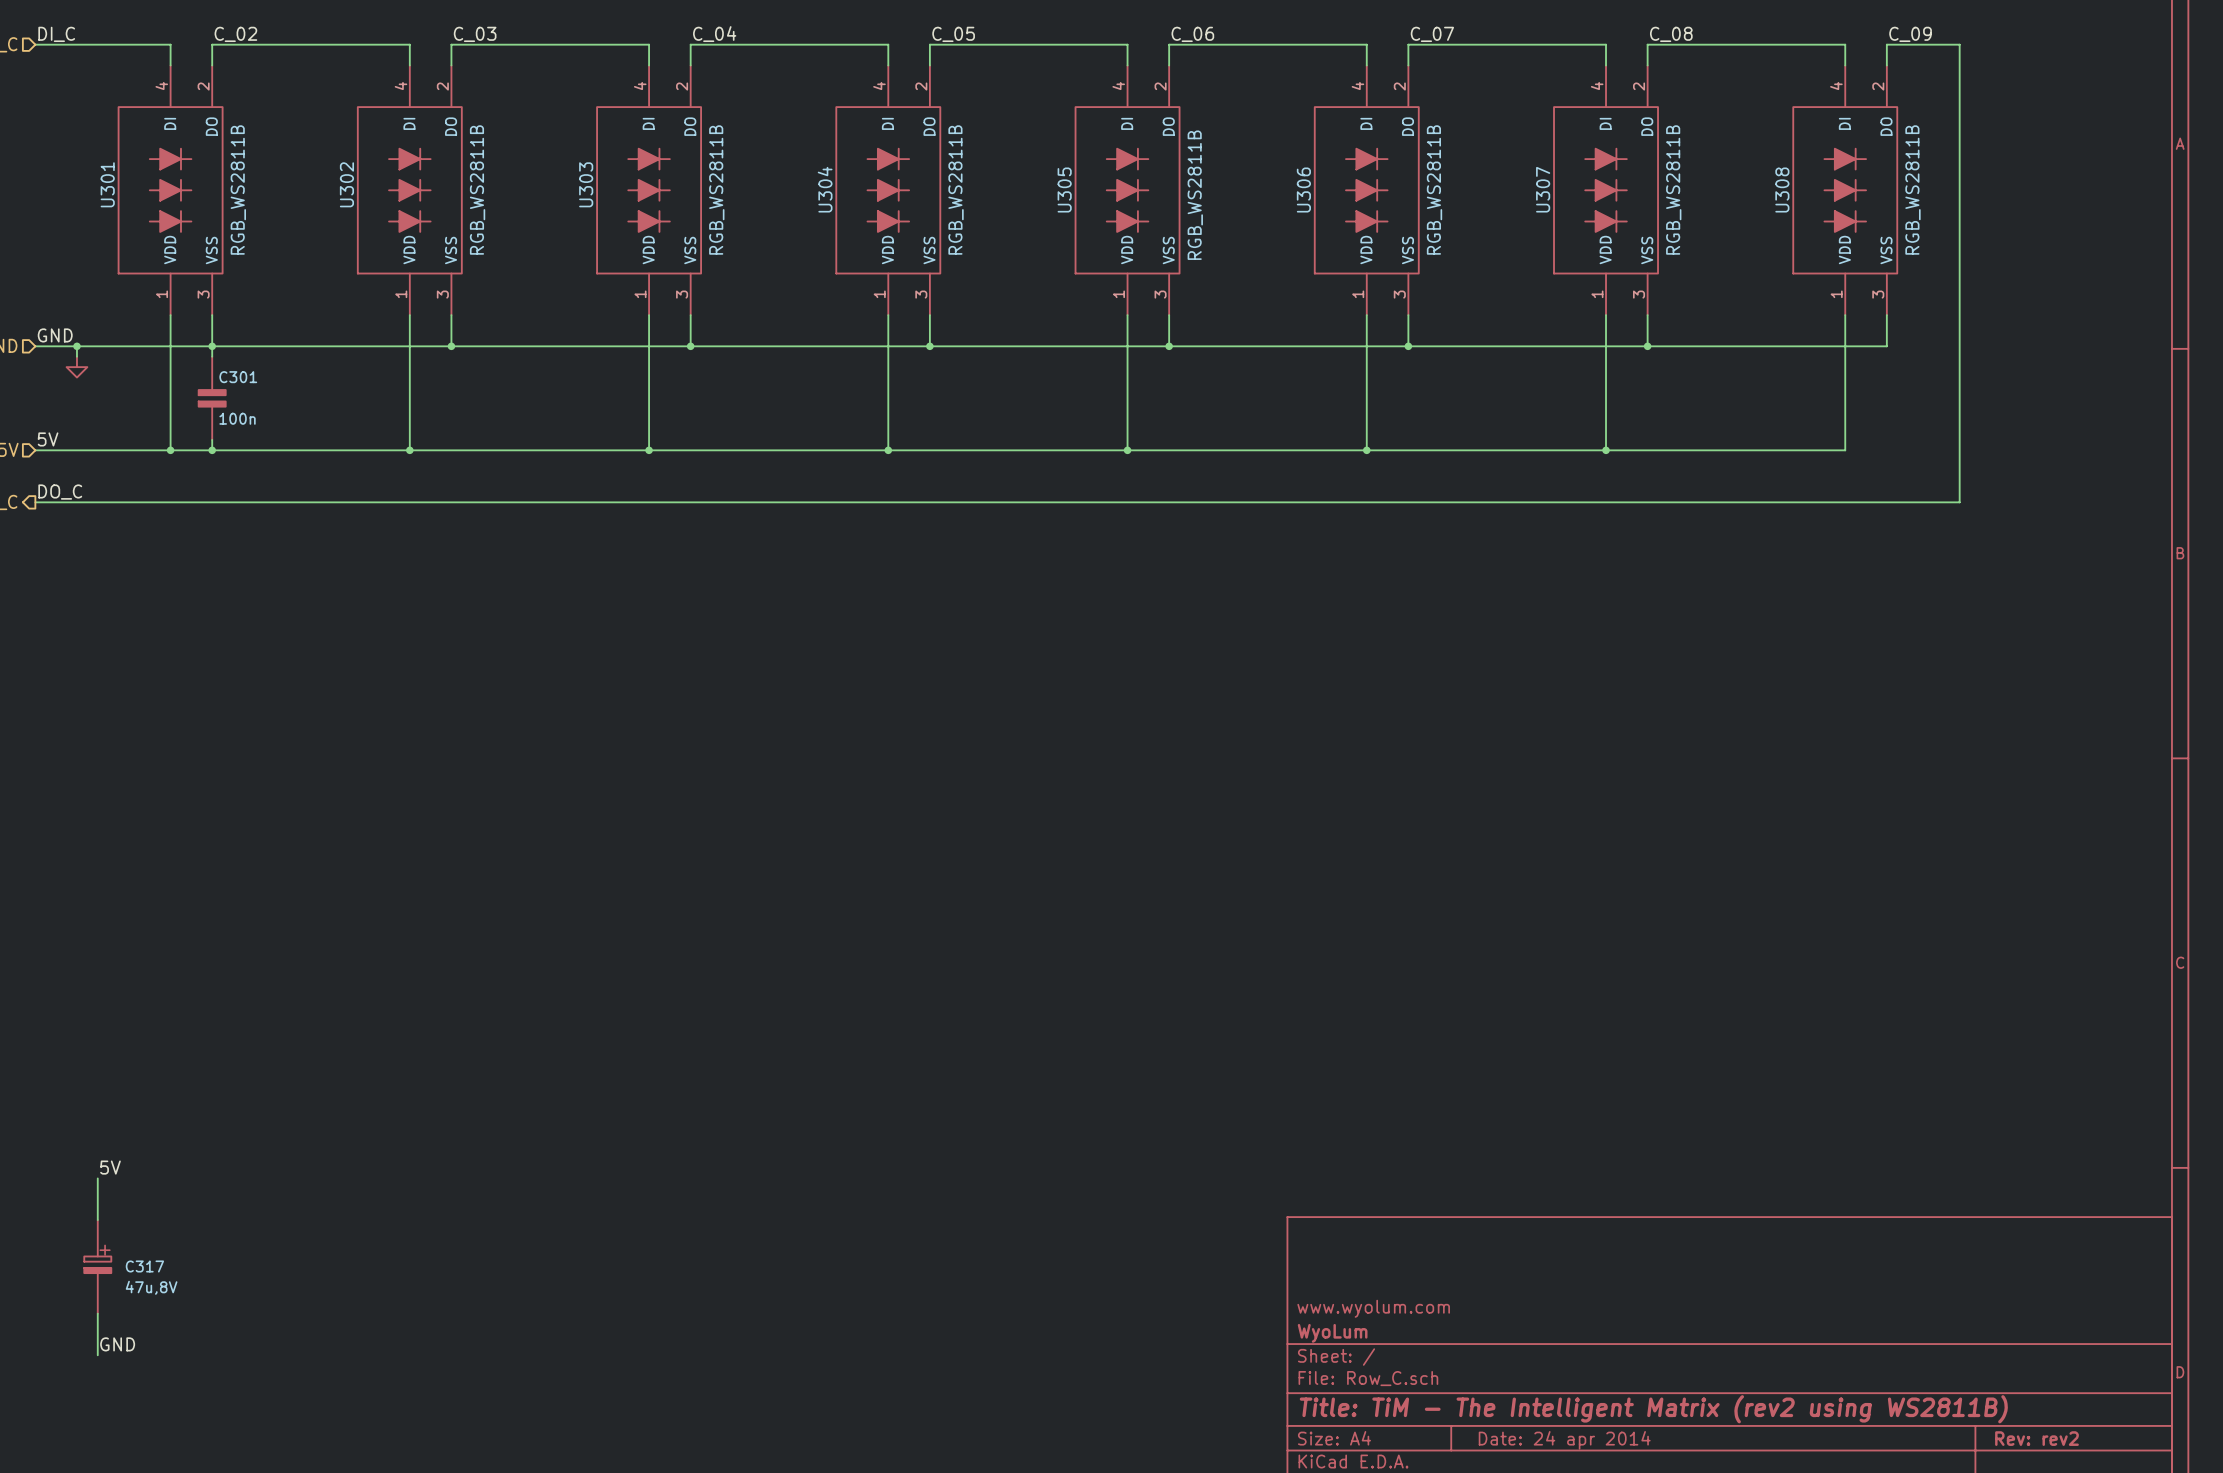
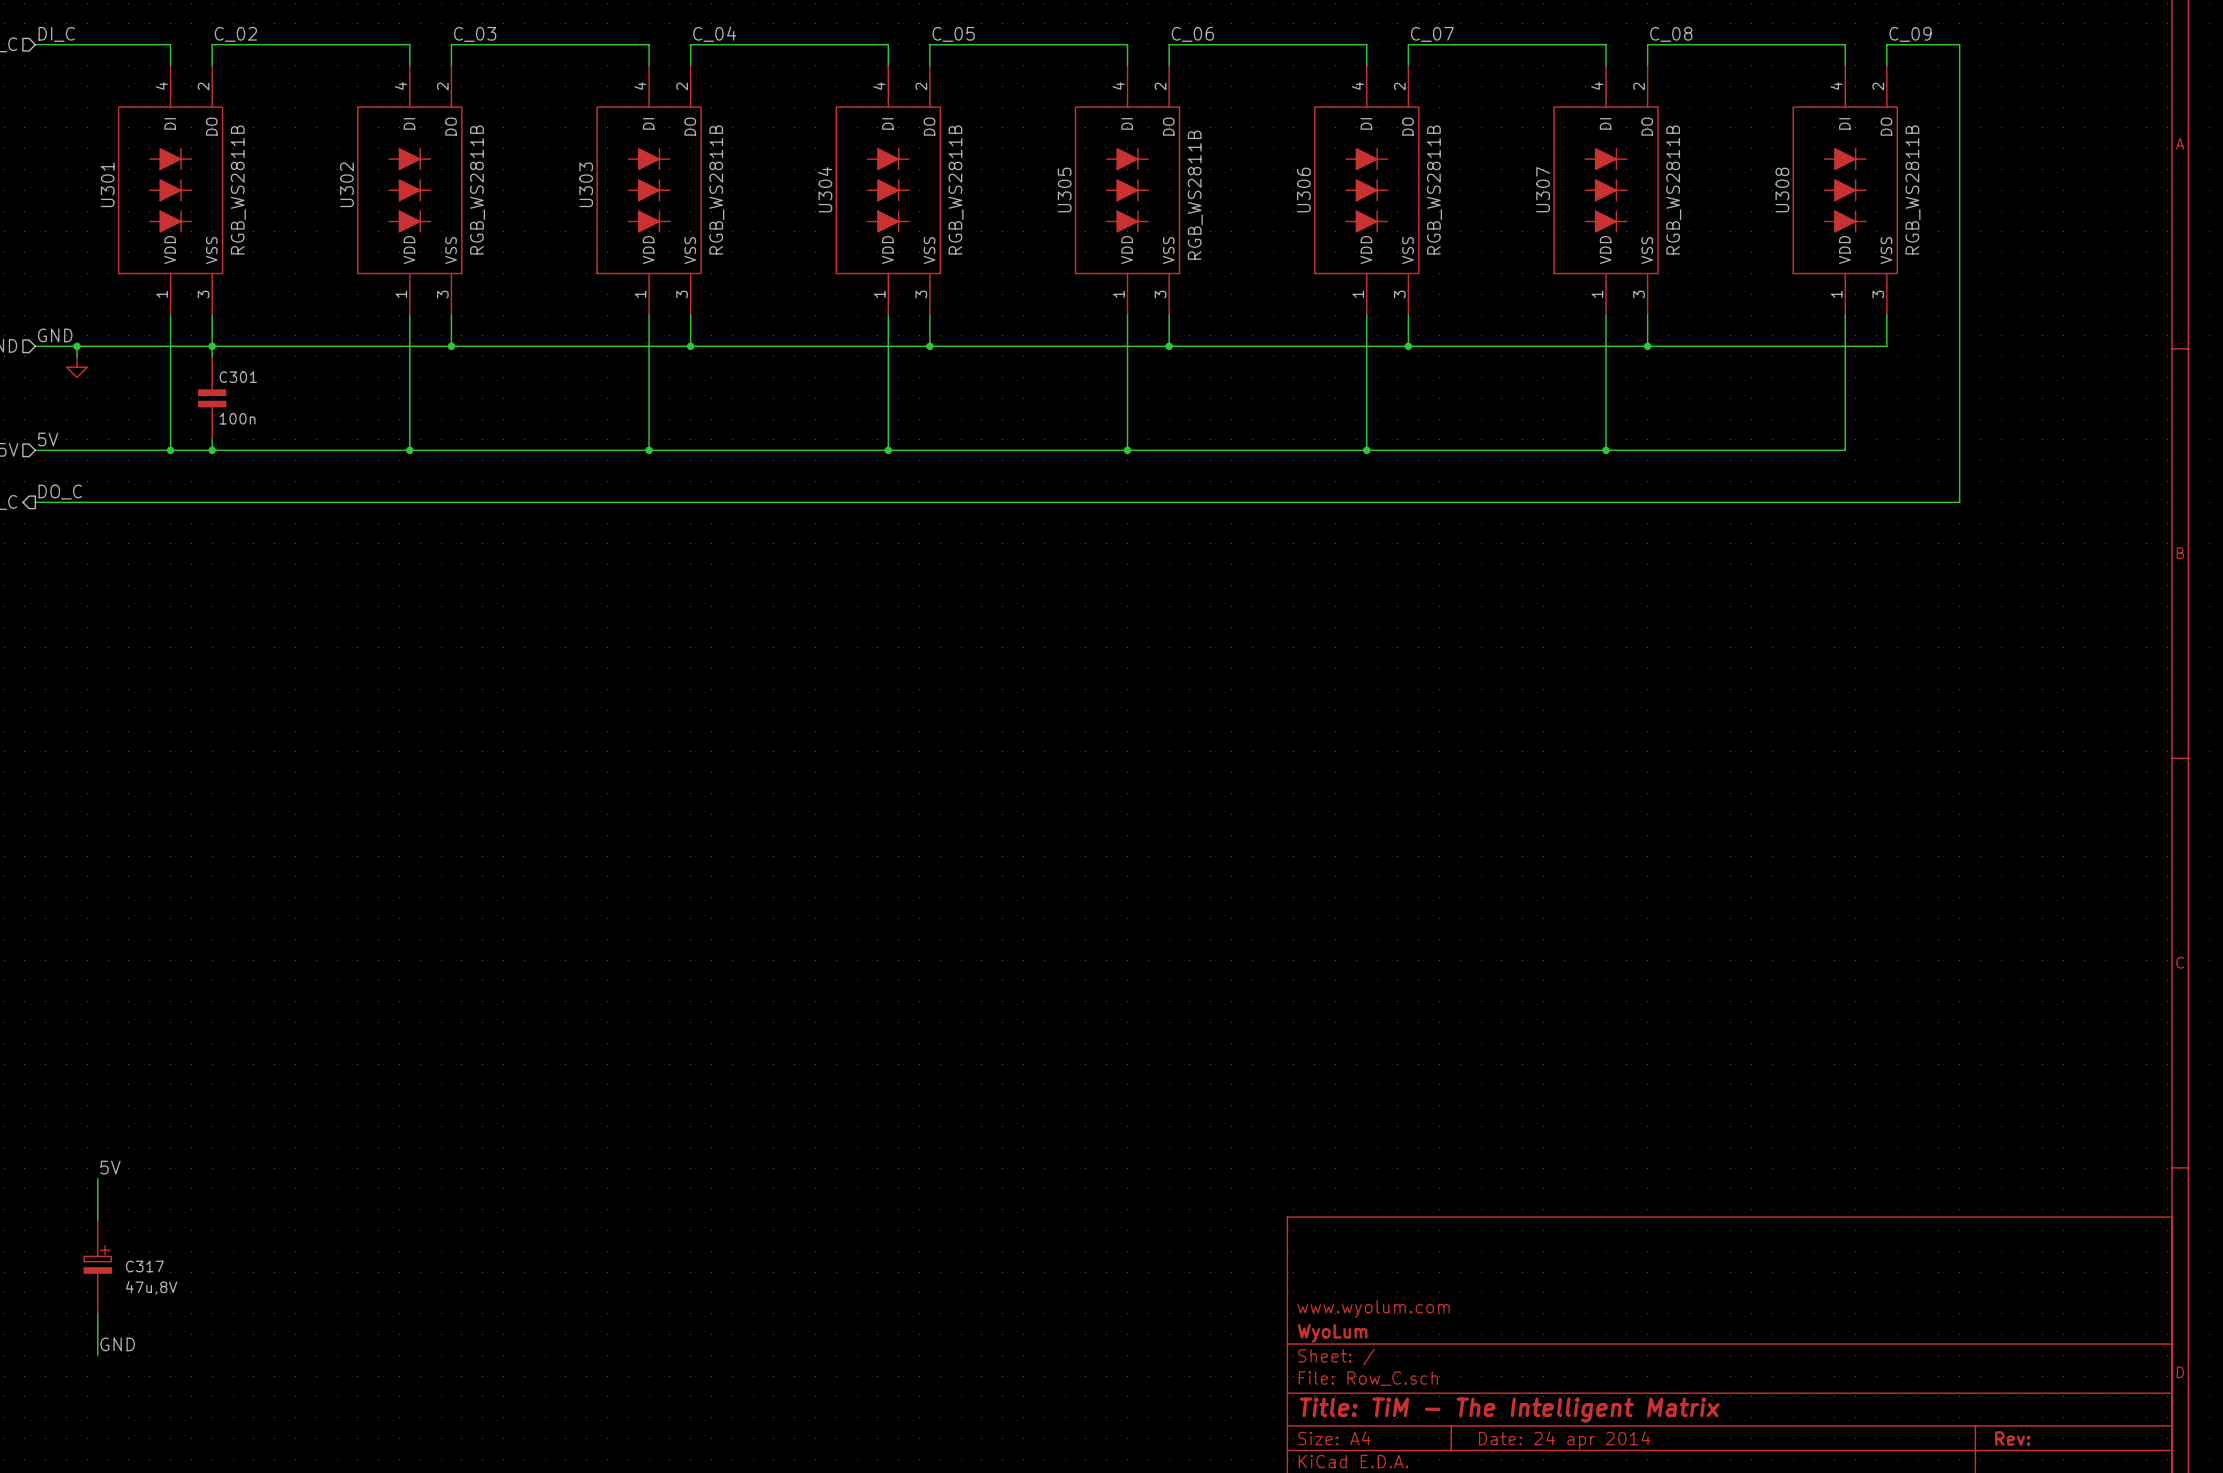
title block: Title: TiM - The Intelligent Matrix (rev2 using WS2811B) (1653, 1409) -> Title: TiM - The Intelligent Matrix (1509, 1410)
title block: Rev: rev2 (2036, 1438) -> Rev: (2012, 1438)

